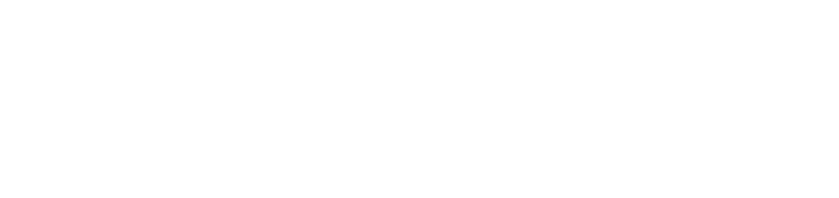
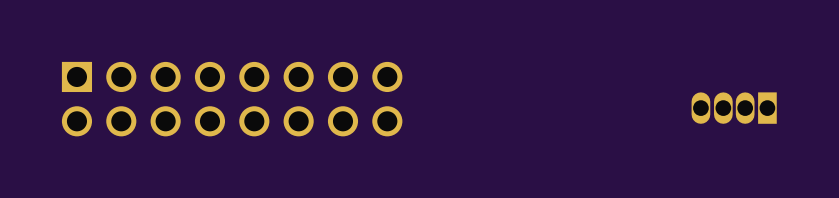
part: none -> (232, 99)
part: none -> (734, 108)

